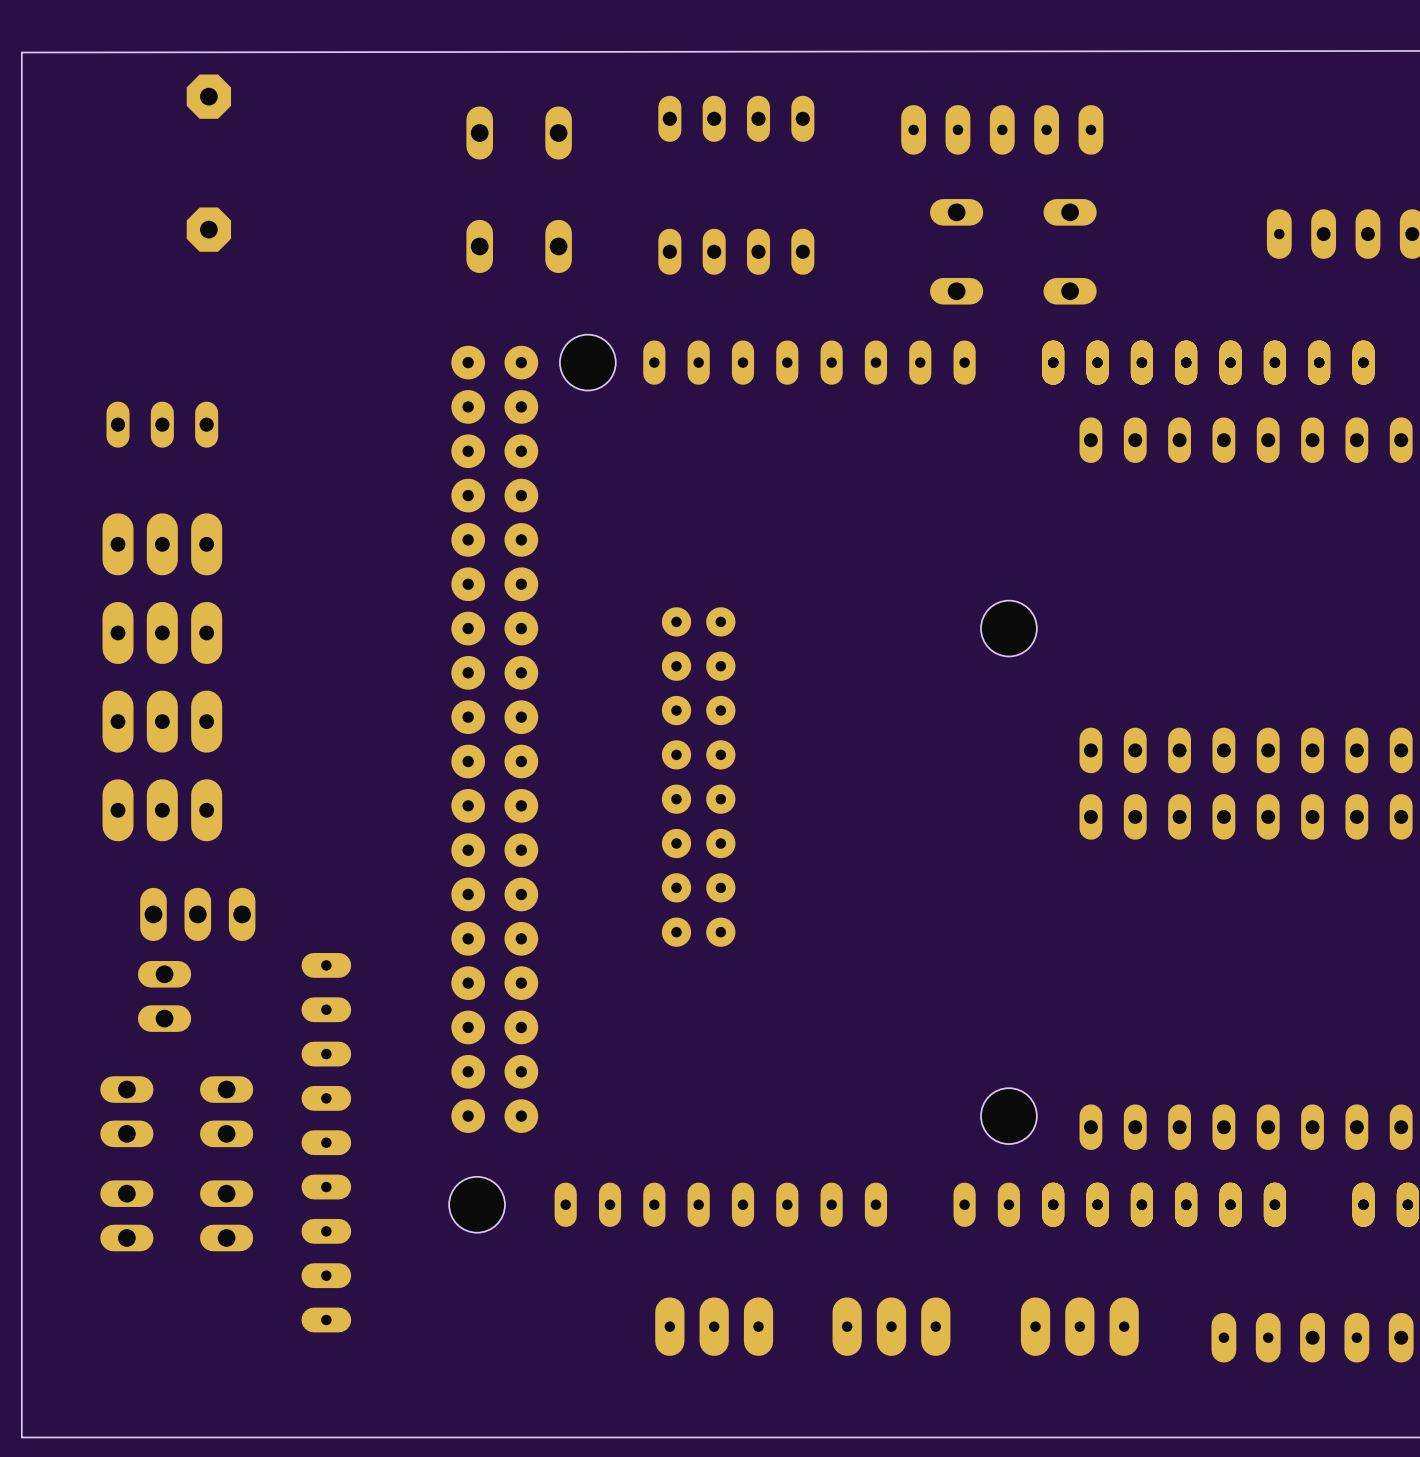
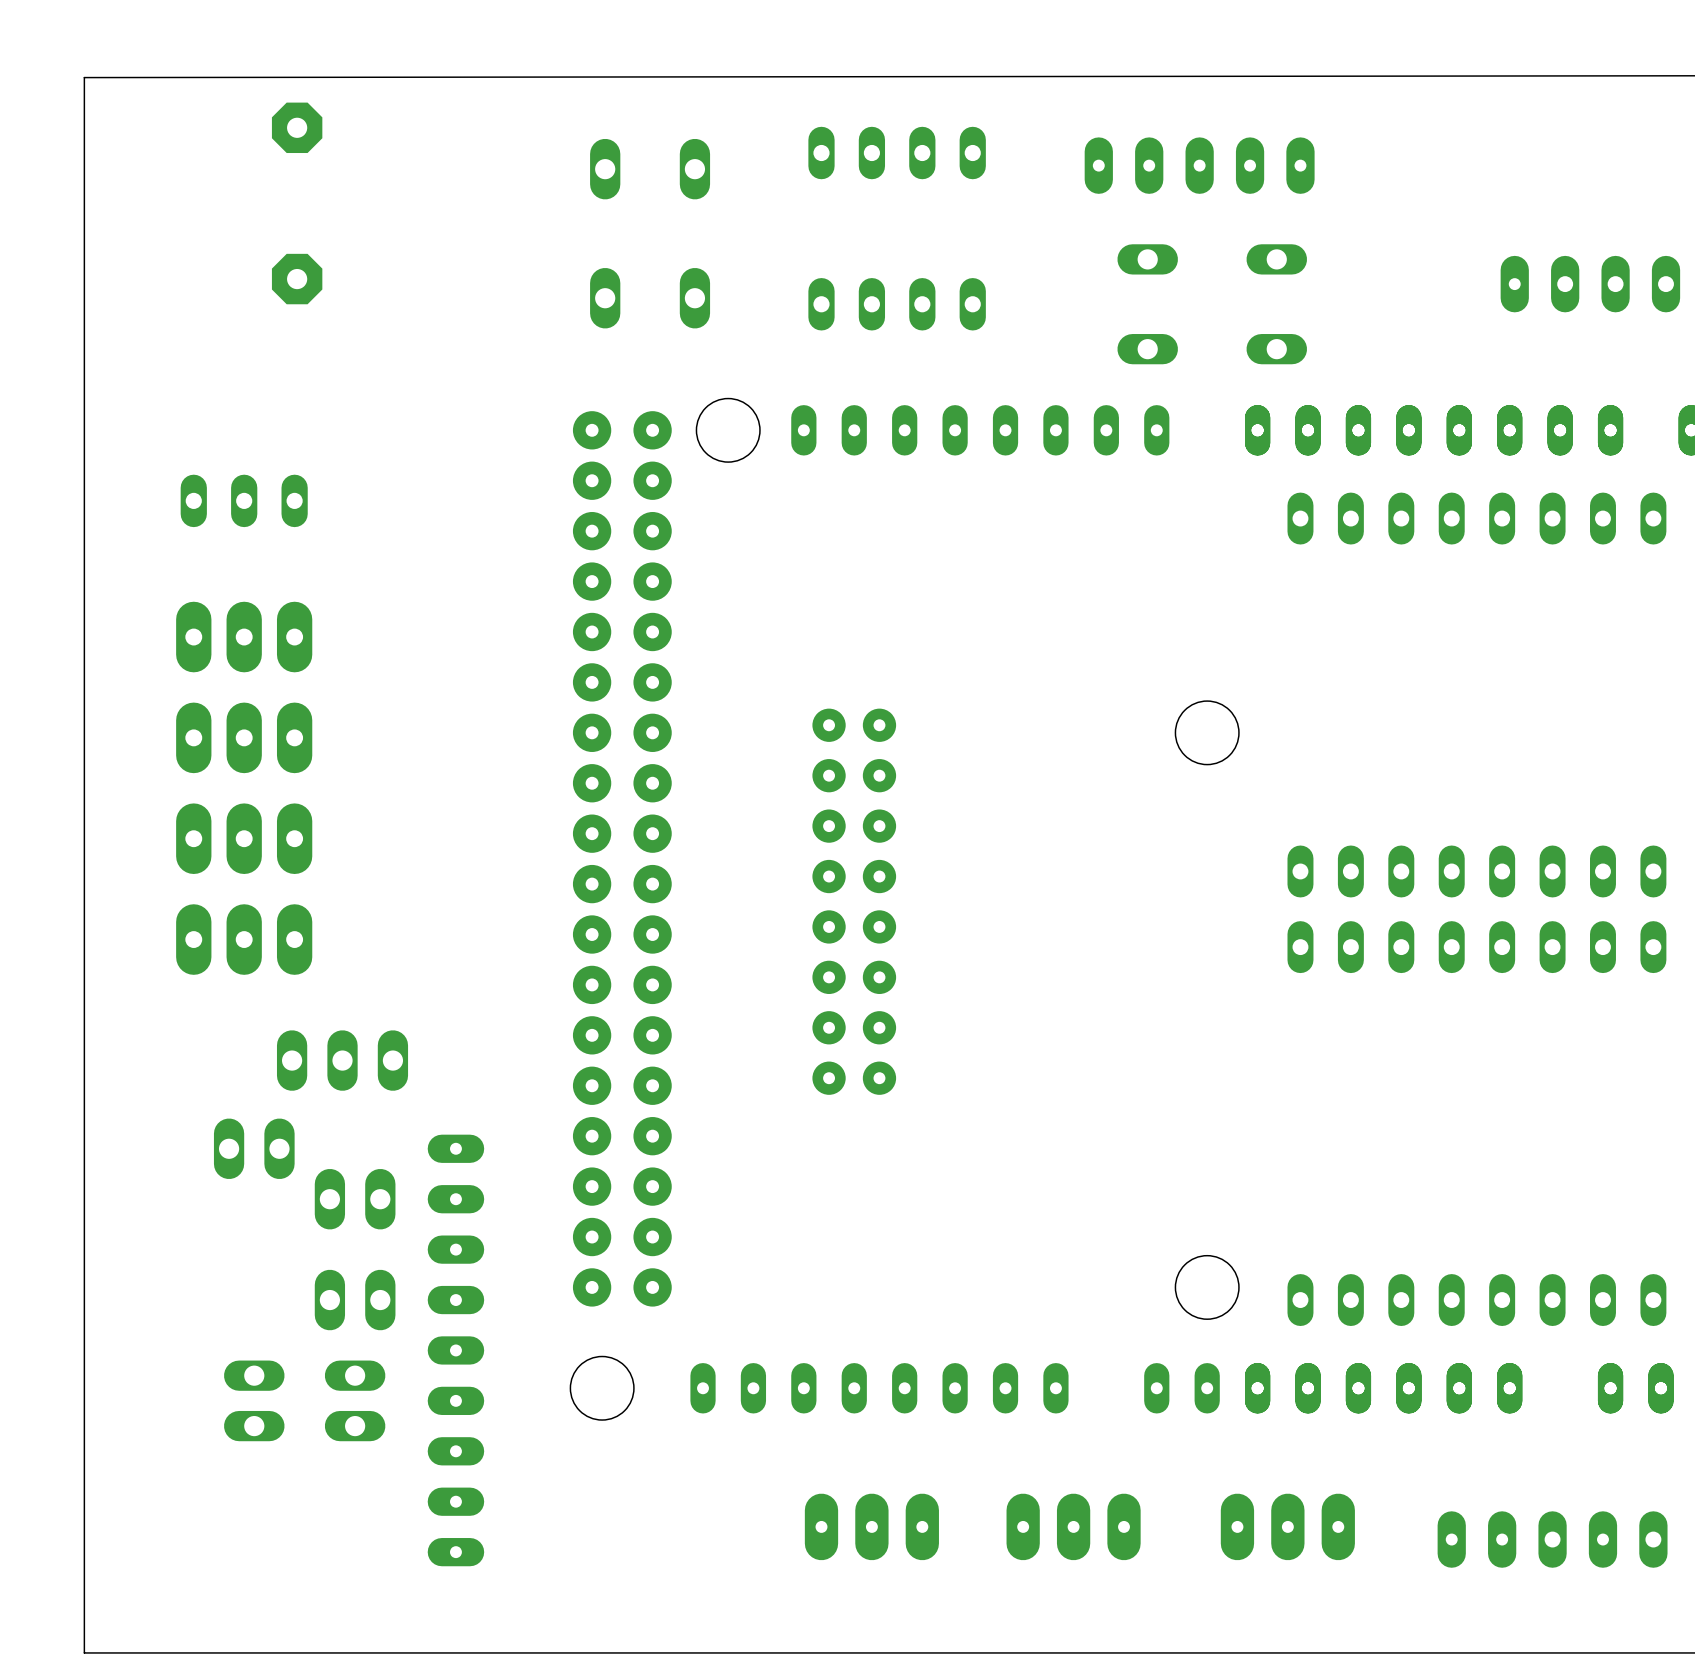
part position: (197, 914) -> (342, 1060)
part rotation: 0° (164, 996) -> 90° clockwise (254, 1148)
part: none -> (355, 1199)
part: (126, 1111) -> none
part rotation: 0° (226, 1111) -> 90° clockwise (355, 1300)
part position: (326, 1142) -> (455, 1350)
part: (126, 1215) -> none
part: none -> (254, 1400)
part: (226, 1215) -> none
part: none -> (355, 1400)

